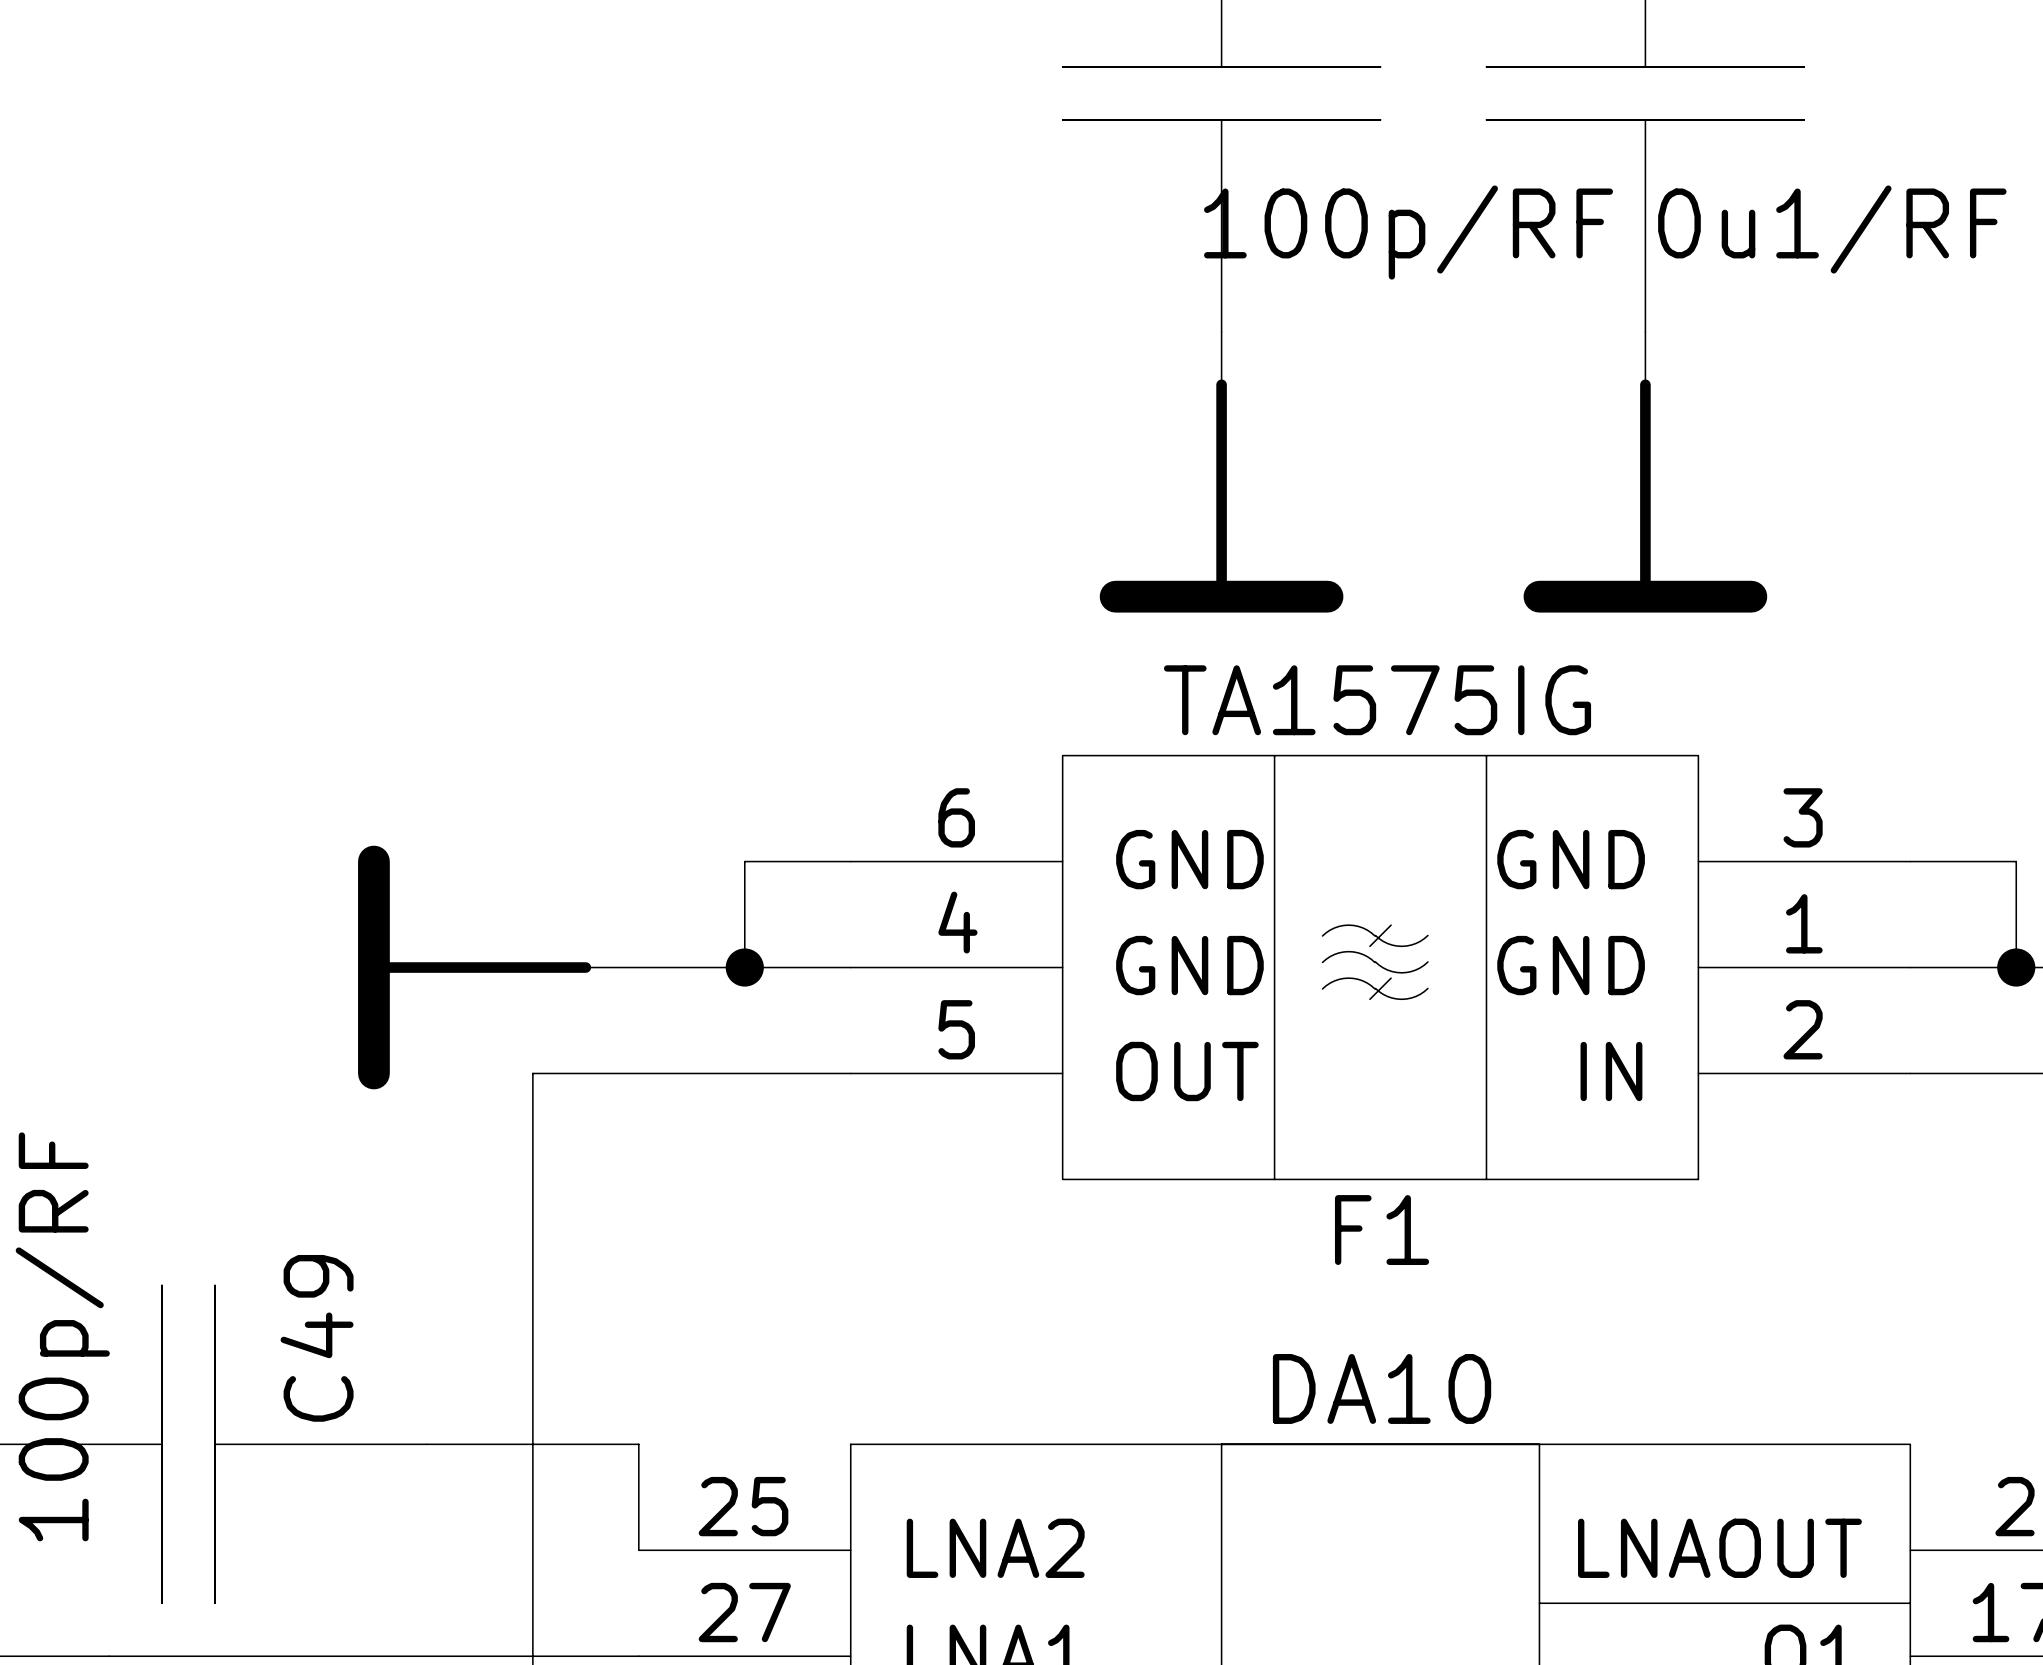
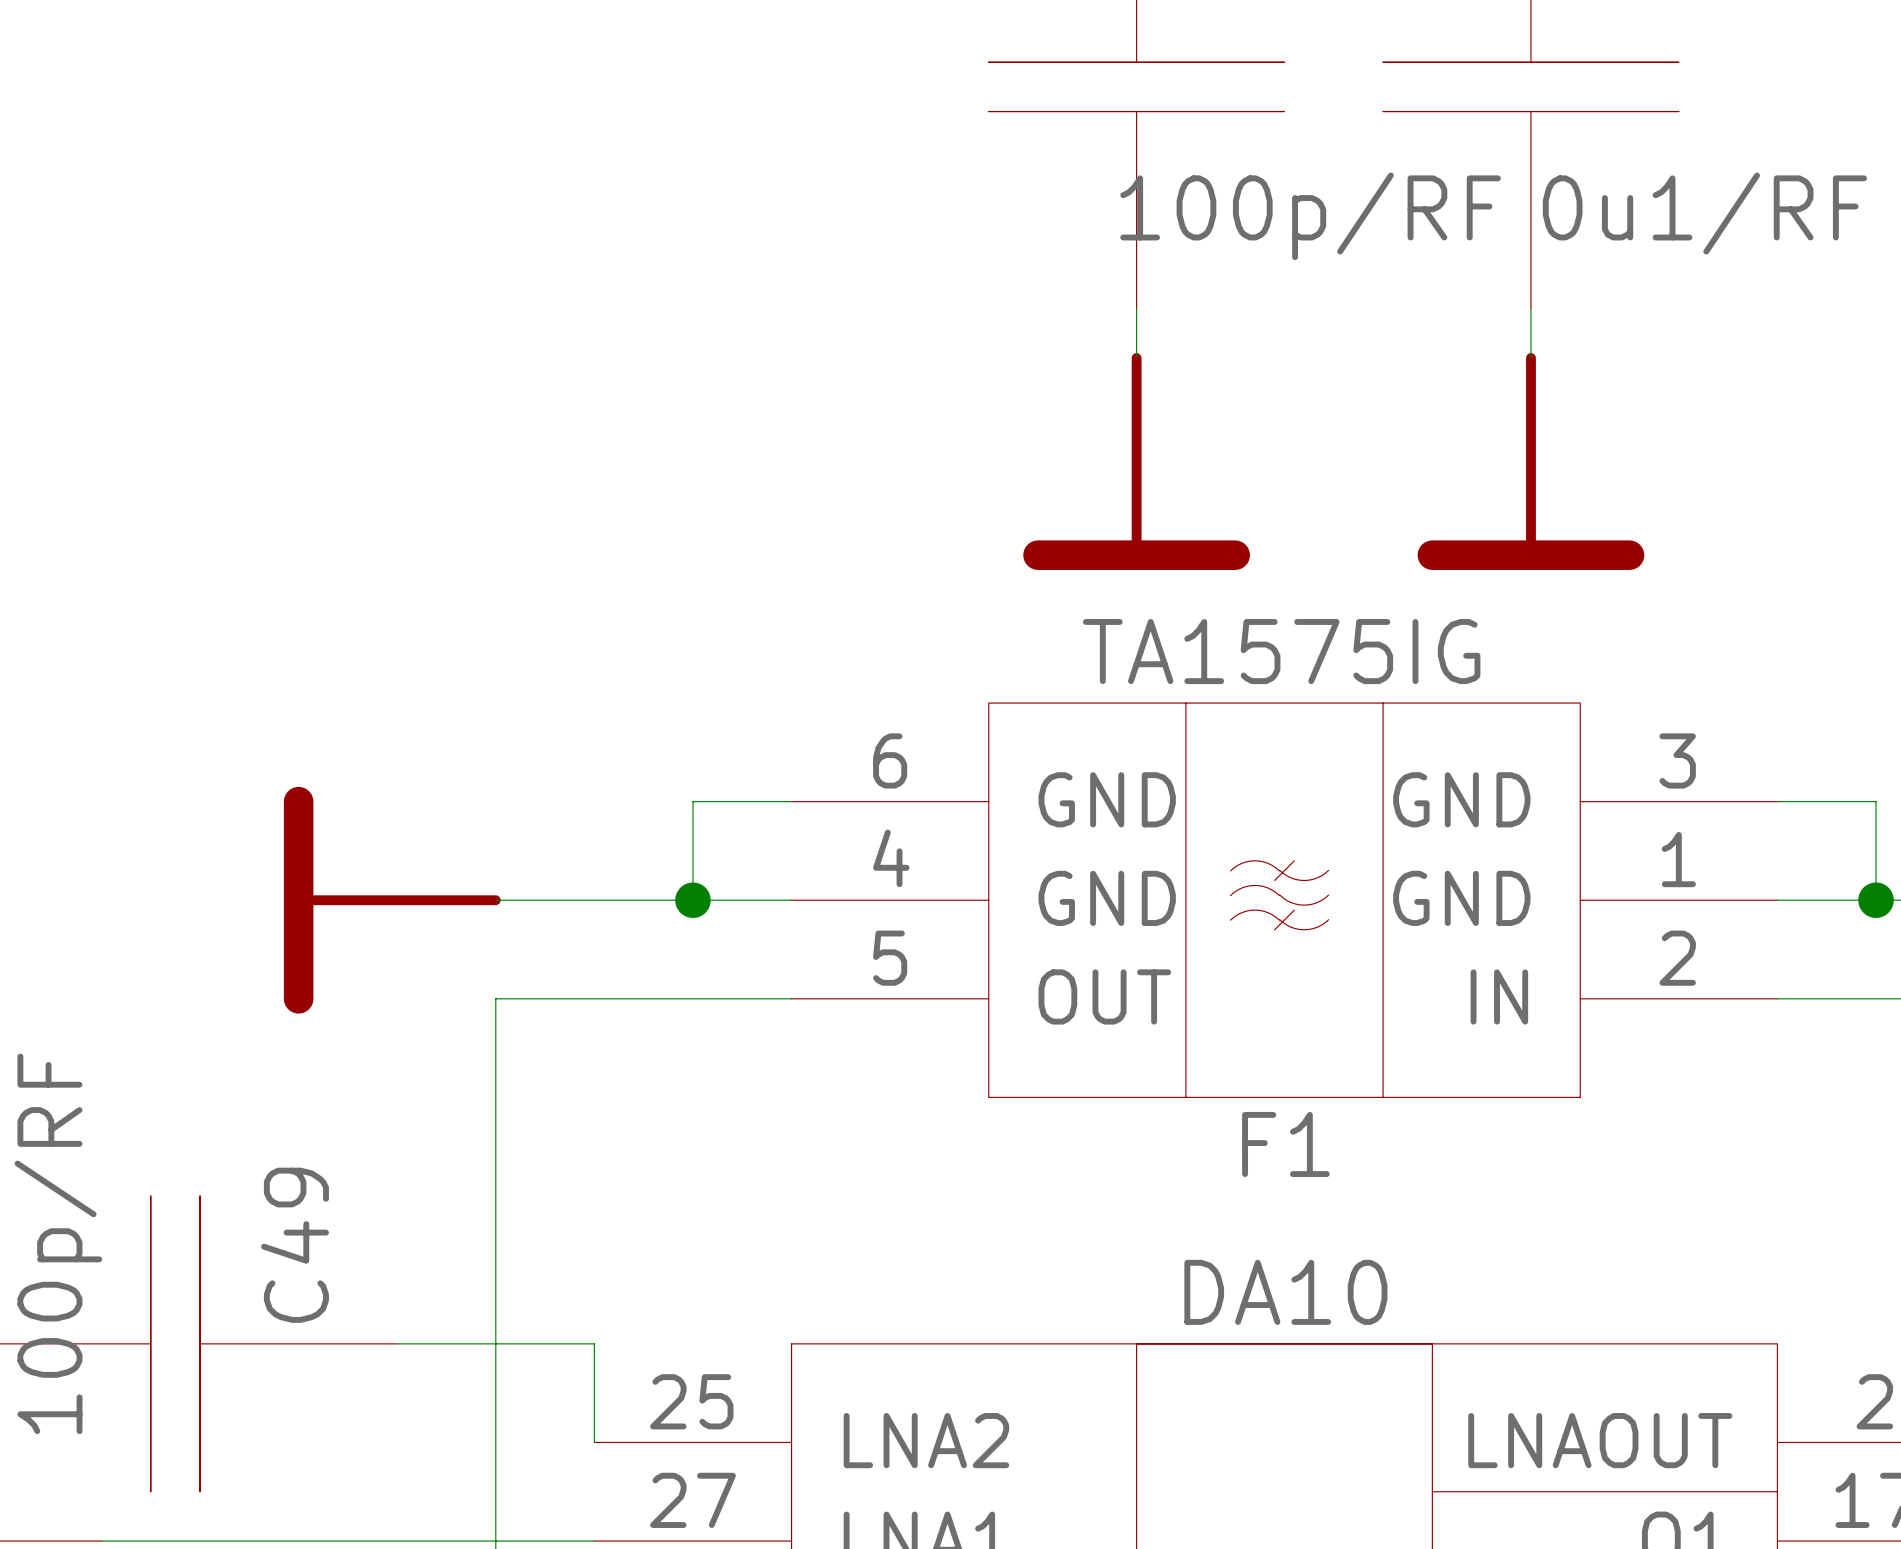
power symbol position: (474, 967) -> (392, 900)

